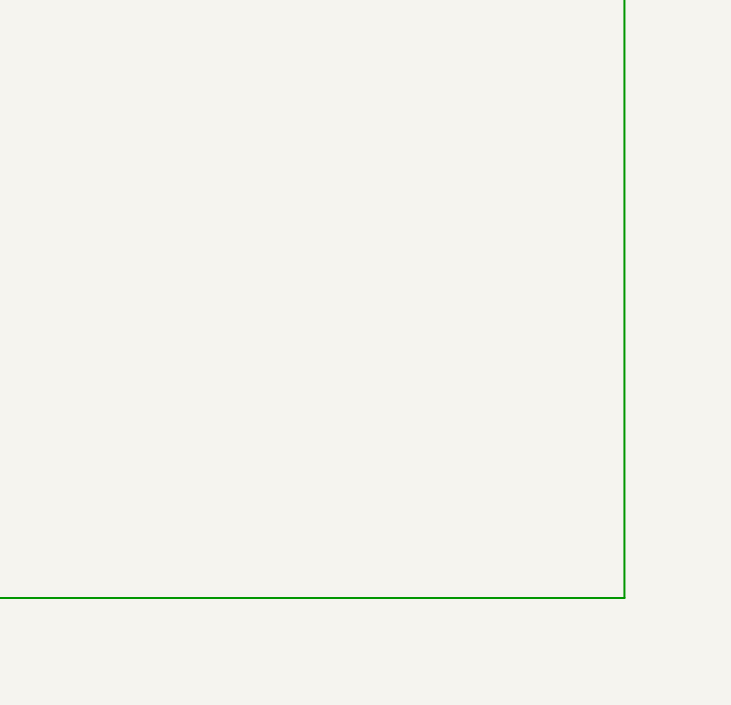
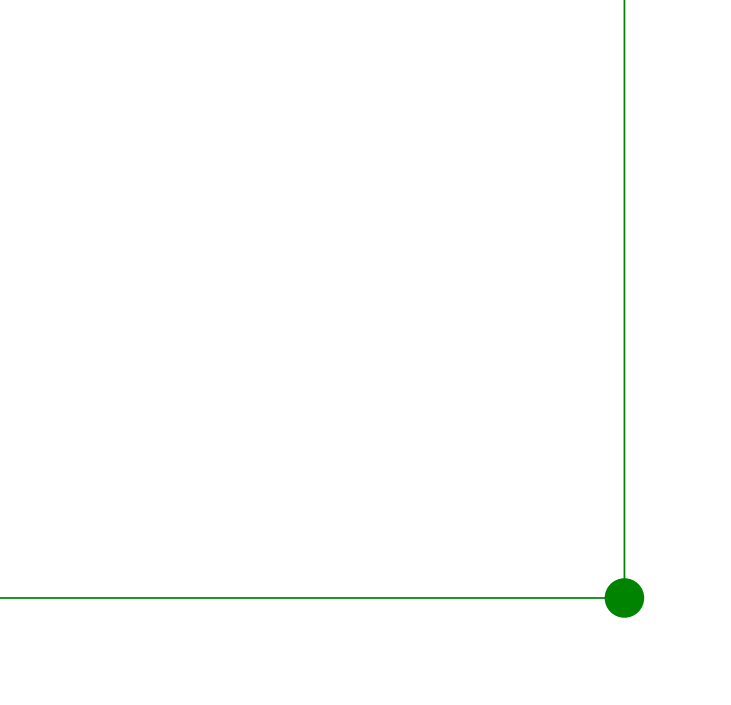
junction: none -> (624, 597)

